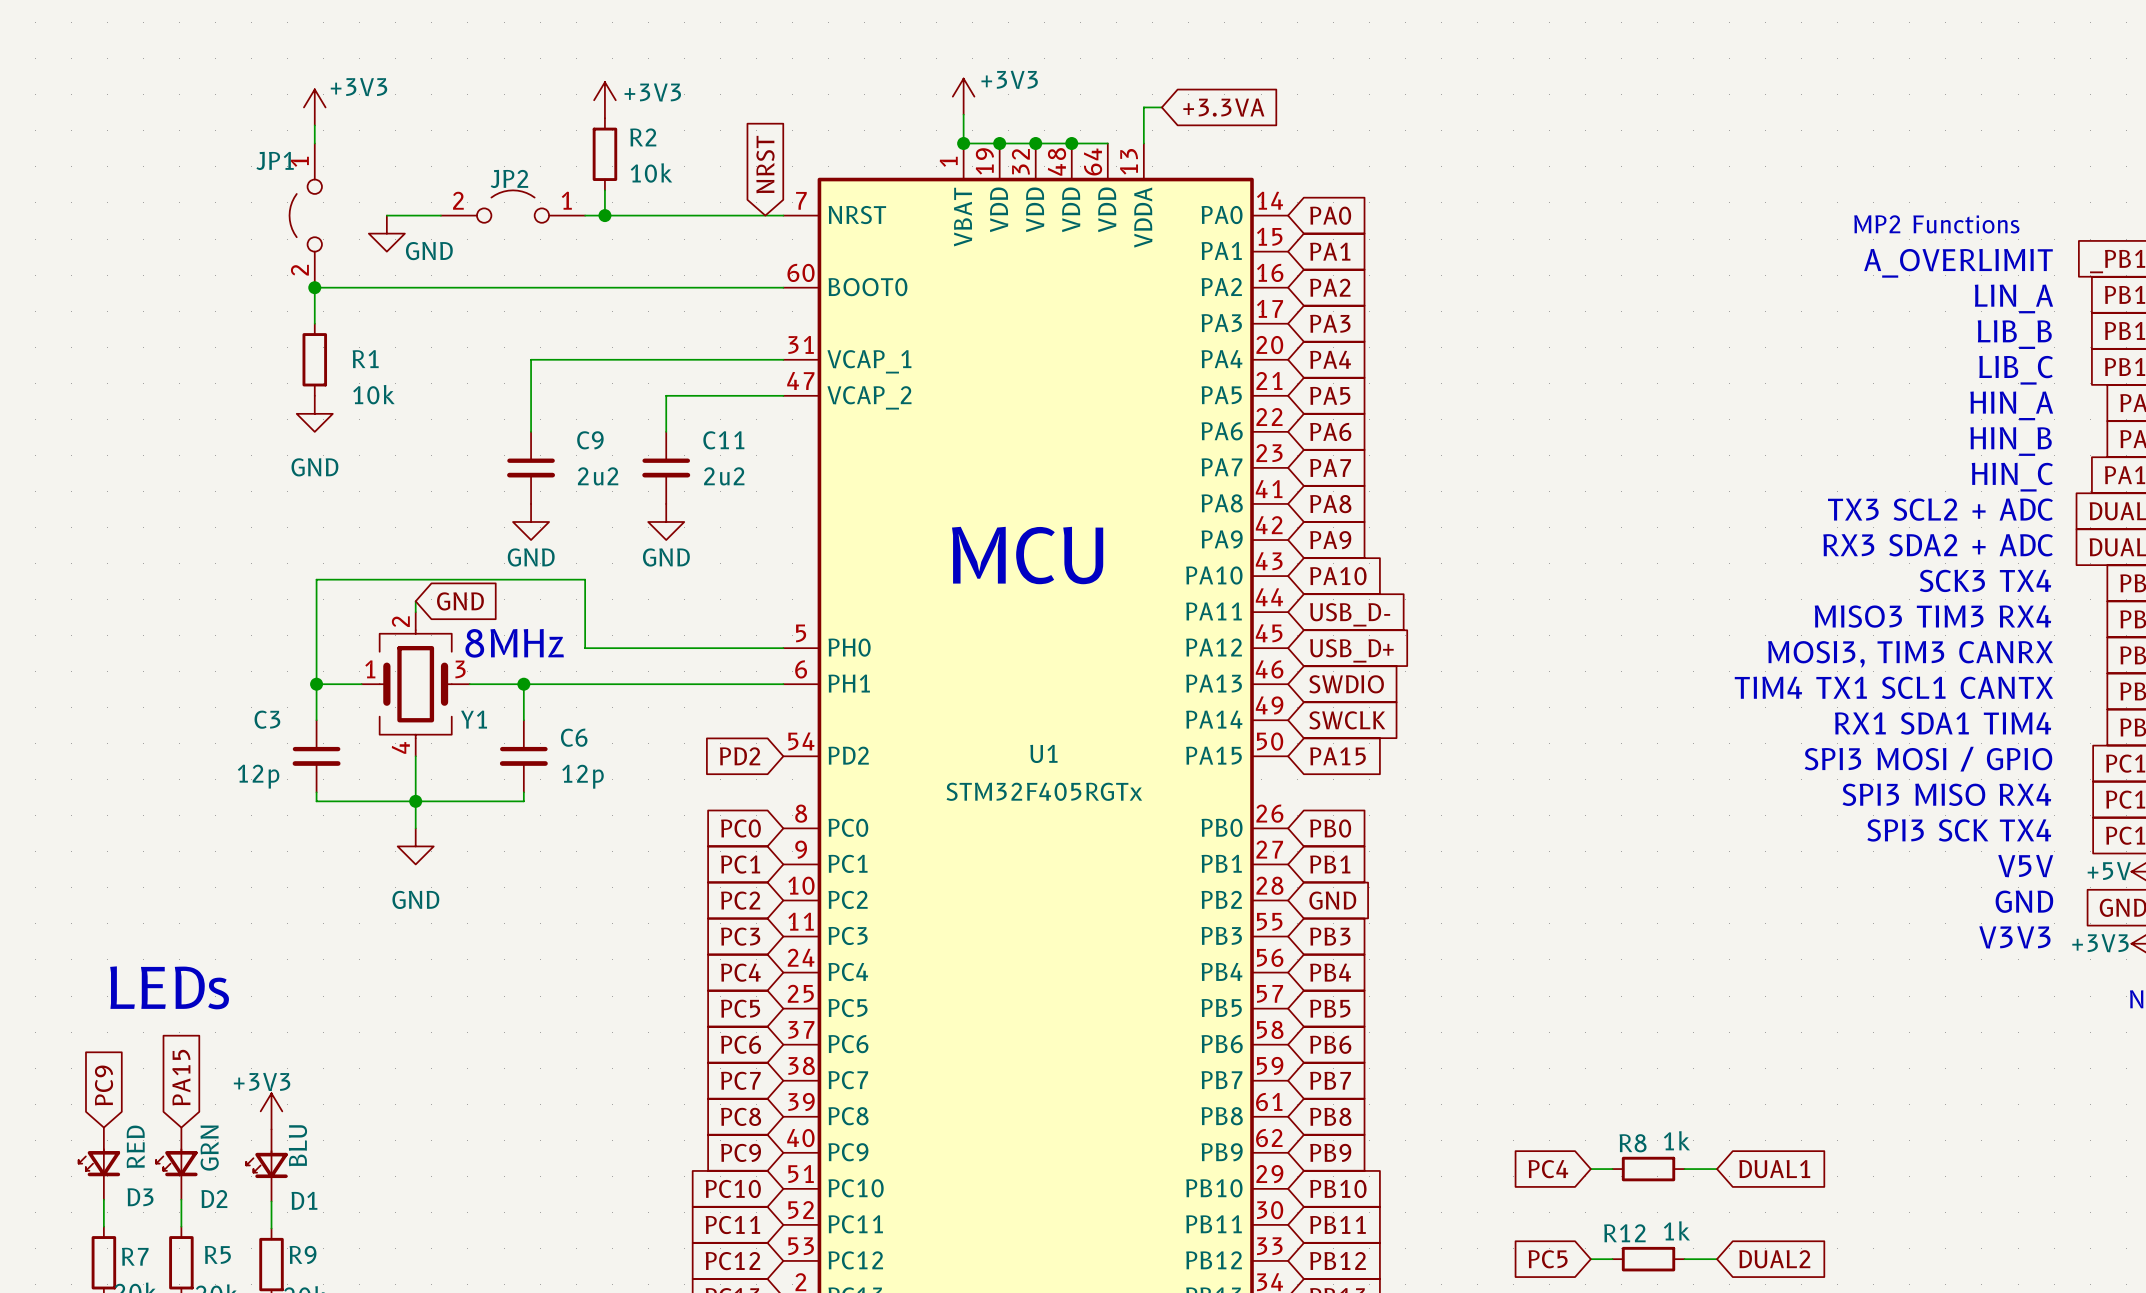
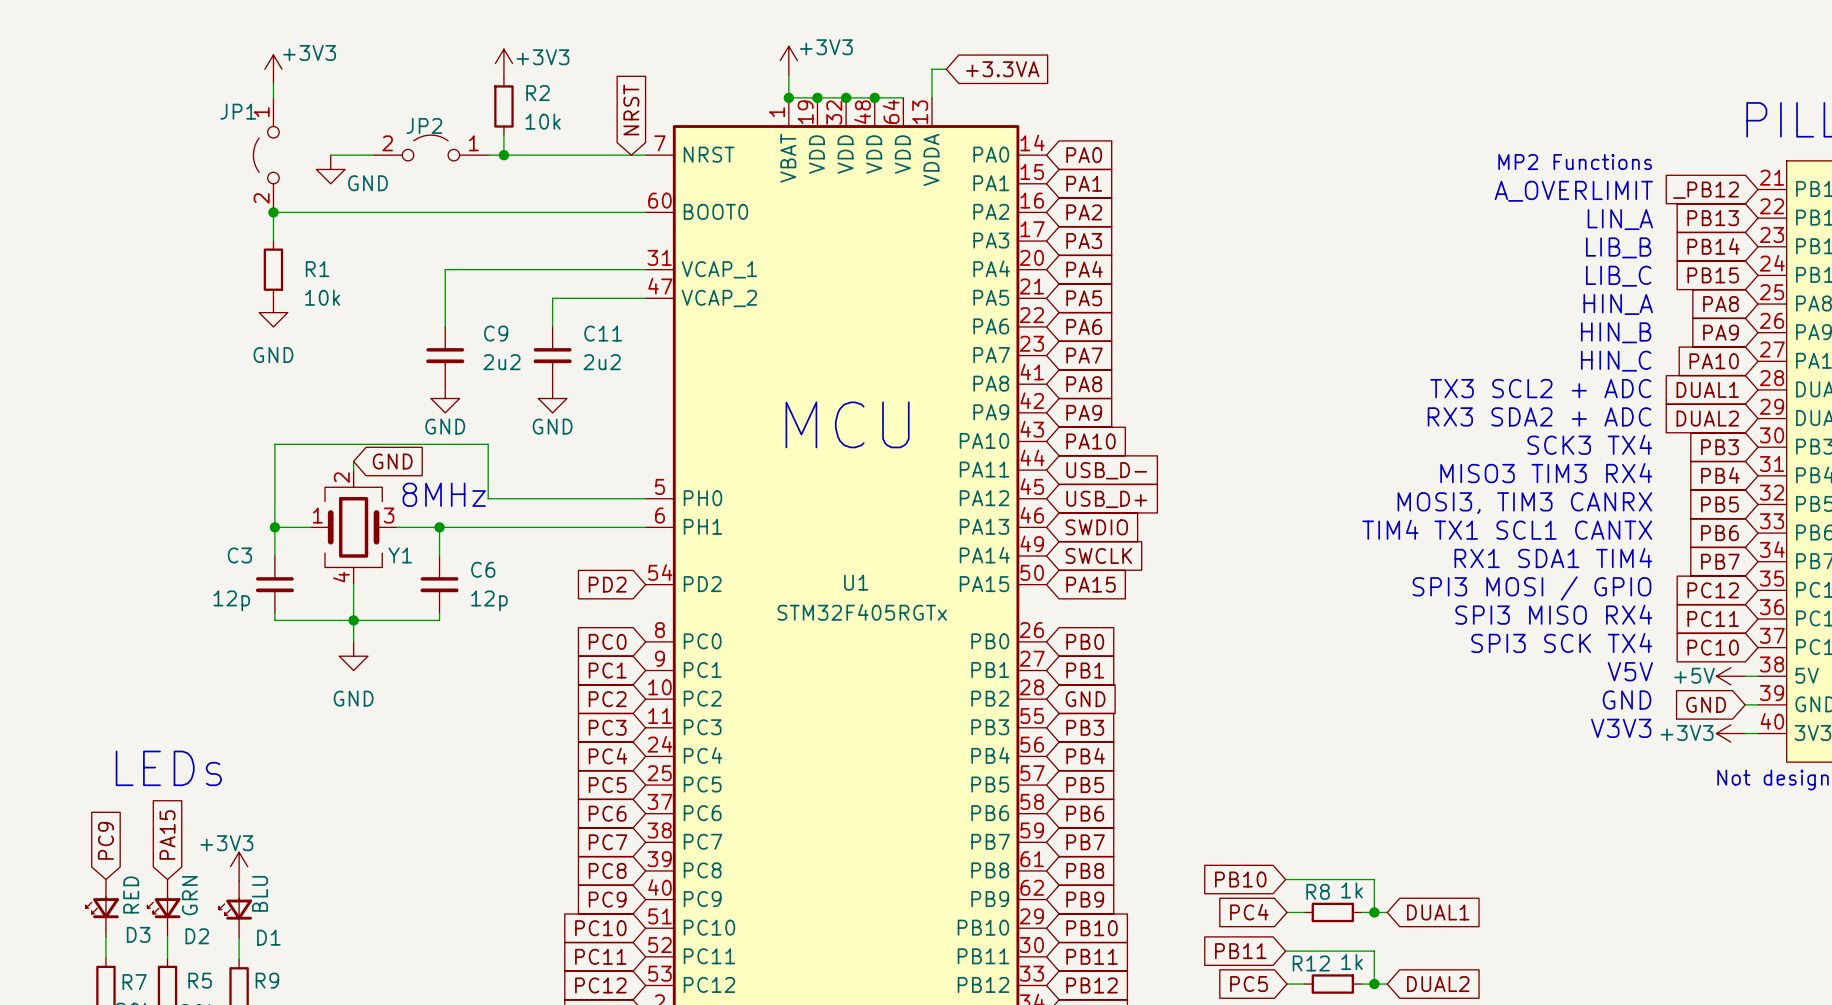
global label: none -> PB10 (1240, 879)
wire: none -> (1285, 879) (1374, 879) (1374, 912)
junction: none -> (1374, 912)
global label: none -> PB11 (1240, 951)
wire: none -> (1285, 951) (1374, 951) (1374, 984)
junction: none -> (1374, 984)

